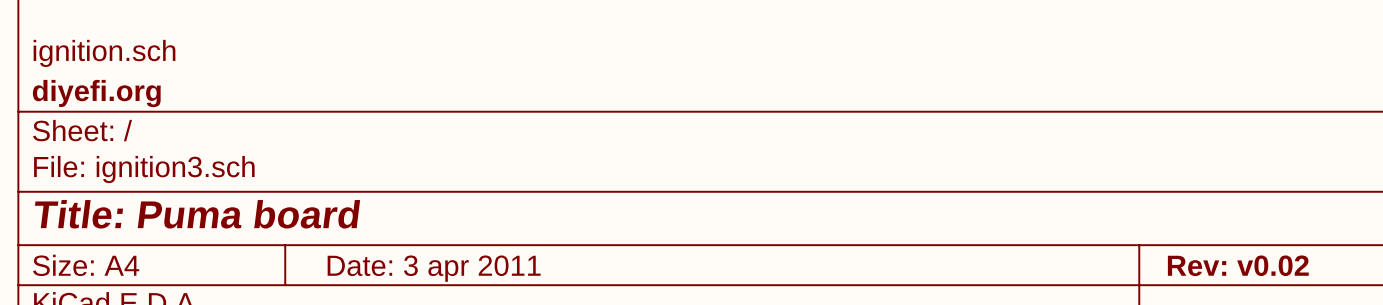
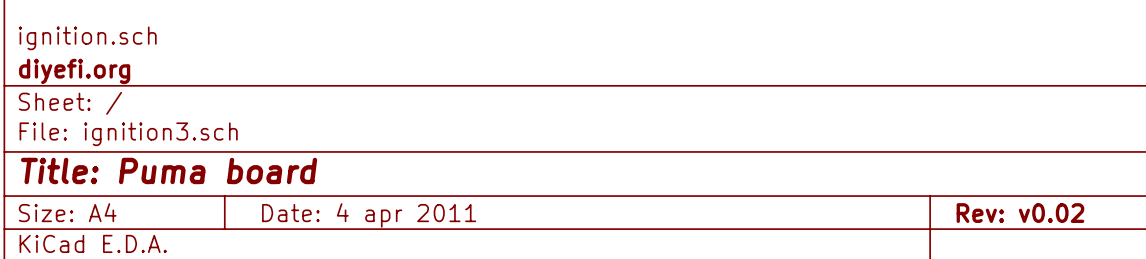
title block: Date: 3 apr 2011 (434, 268) -> Date: 4 apr 2011 (369, 215)

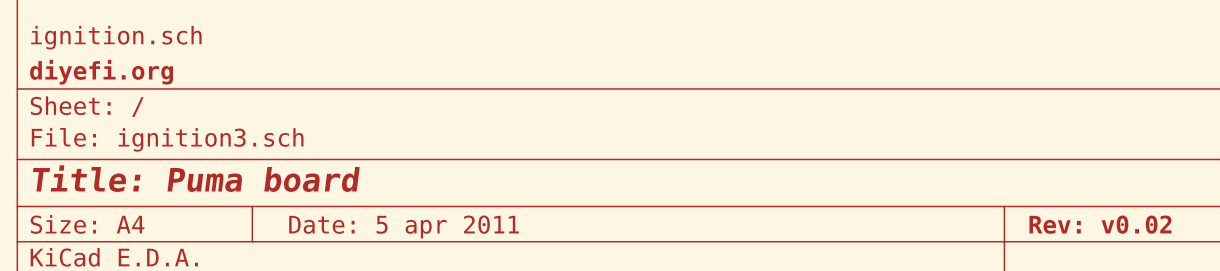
title block: Date: 4 apr 2011 (369, 215) -> Date: 5 apr 2011 (404, 226)

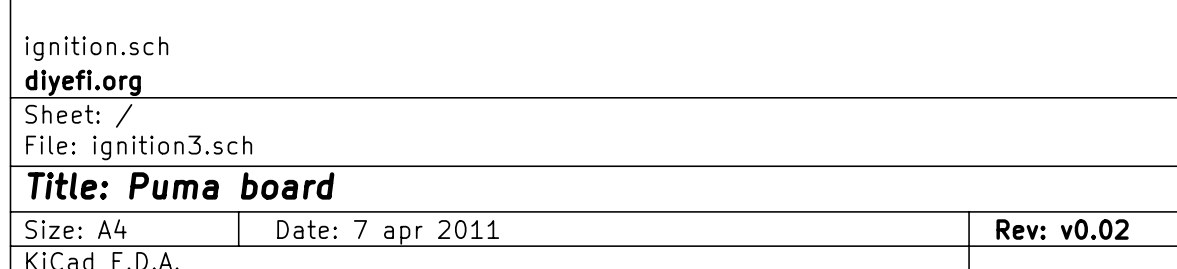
title block: Date: 5 apr 2011 (404, 226) -> Date: 7 apr 2011 (388, 232)

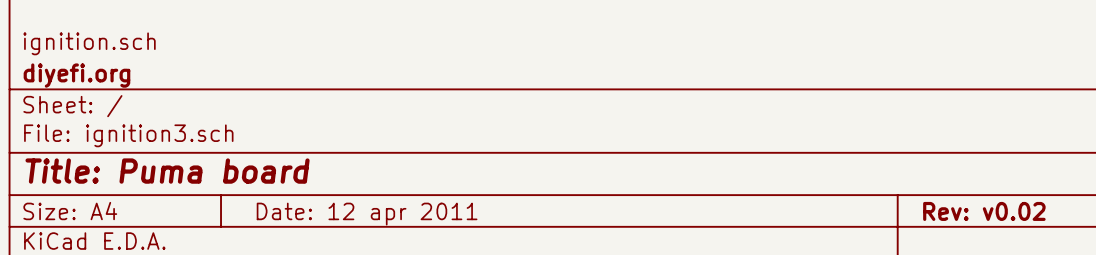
title block: Date: 7 apr 2011 (388, 232) -> Date: 12 apr 2011 (367, 214)

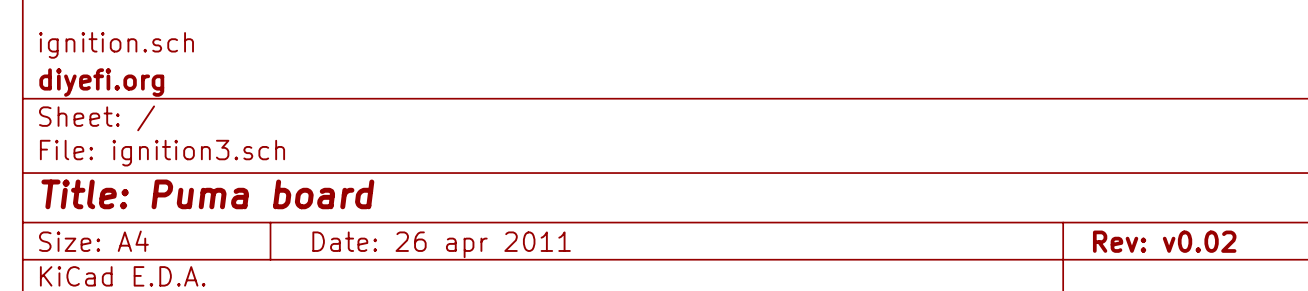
title block: Date: 12 apr 2011 (367, 214) -> Date: 26 apr 2011 (441, 244)

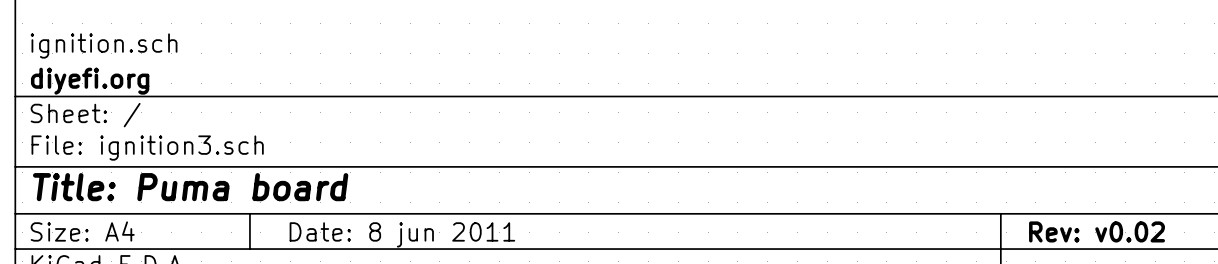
title block: Date: 26 apr 2011 (441, 244) -> Date: 8 jun 2011 (402, 234)

